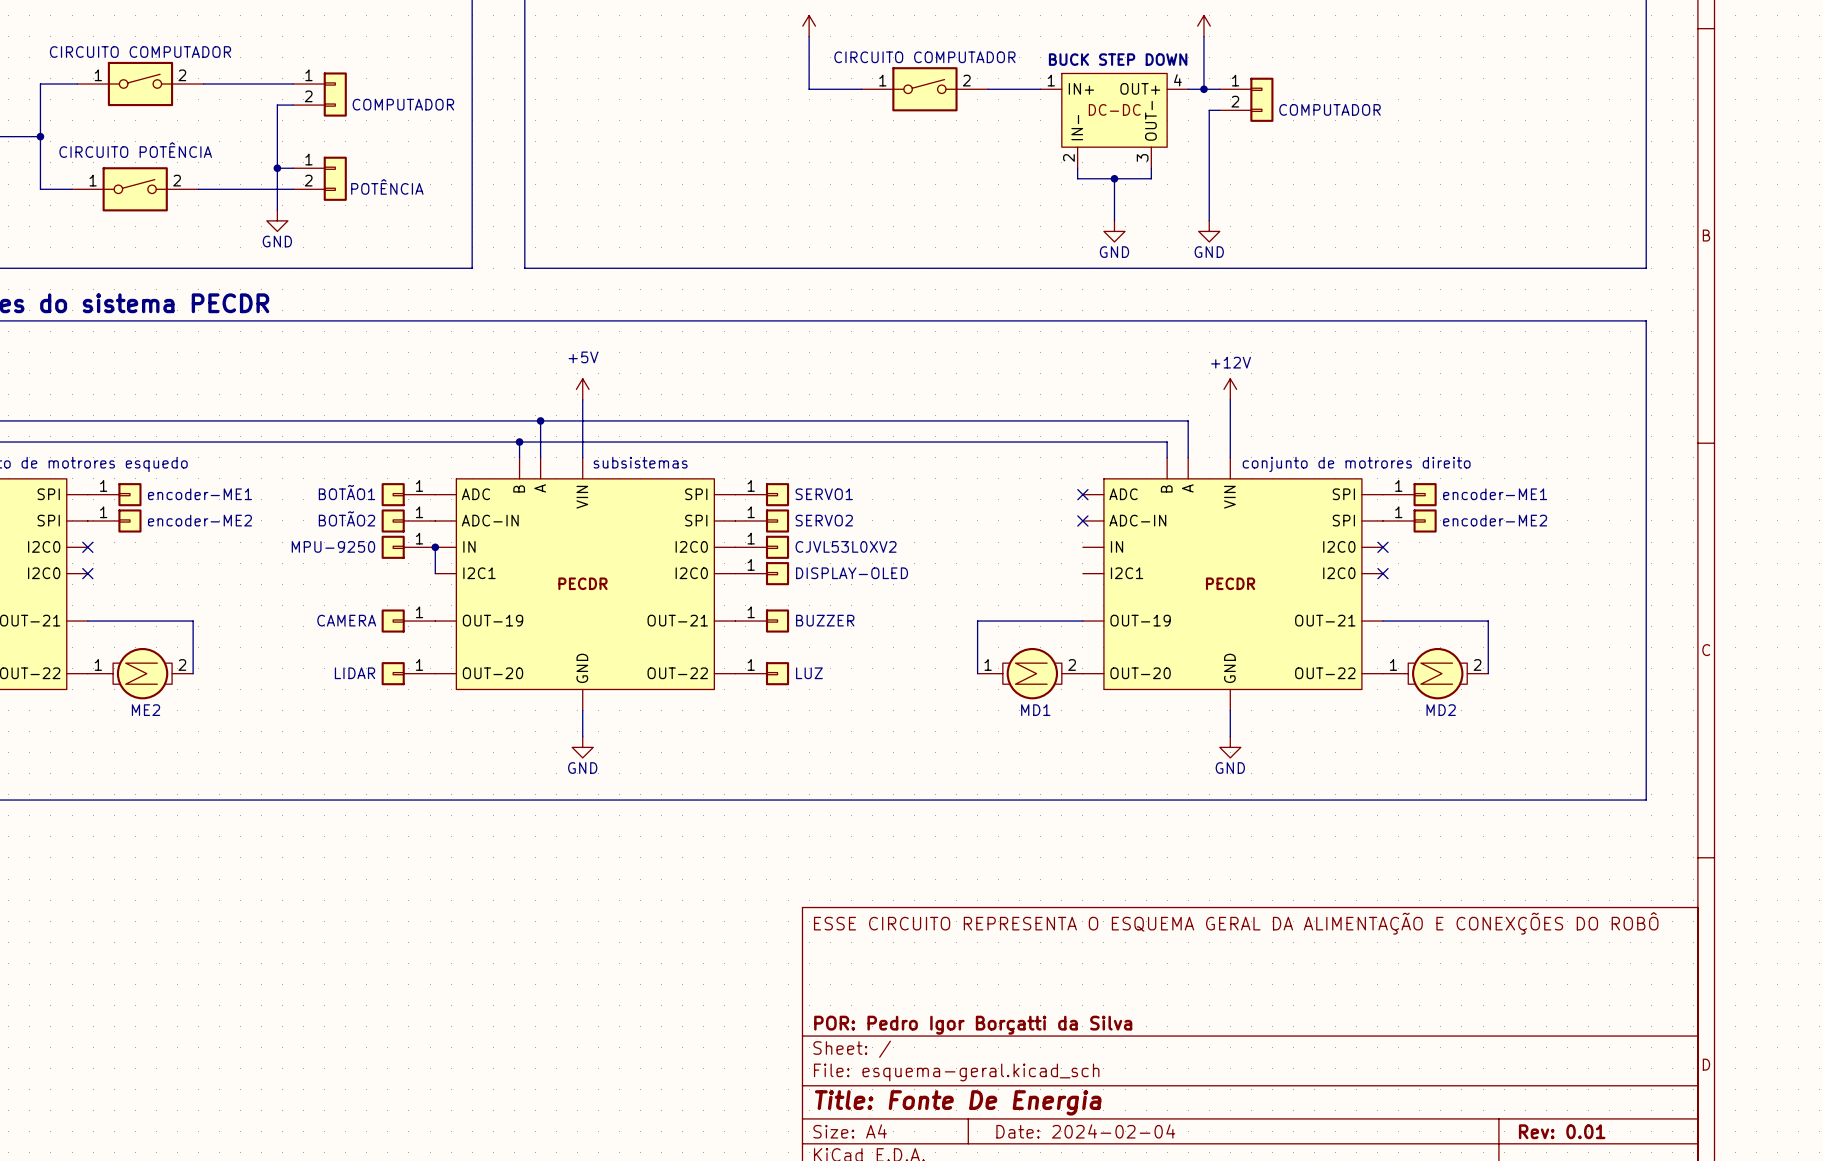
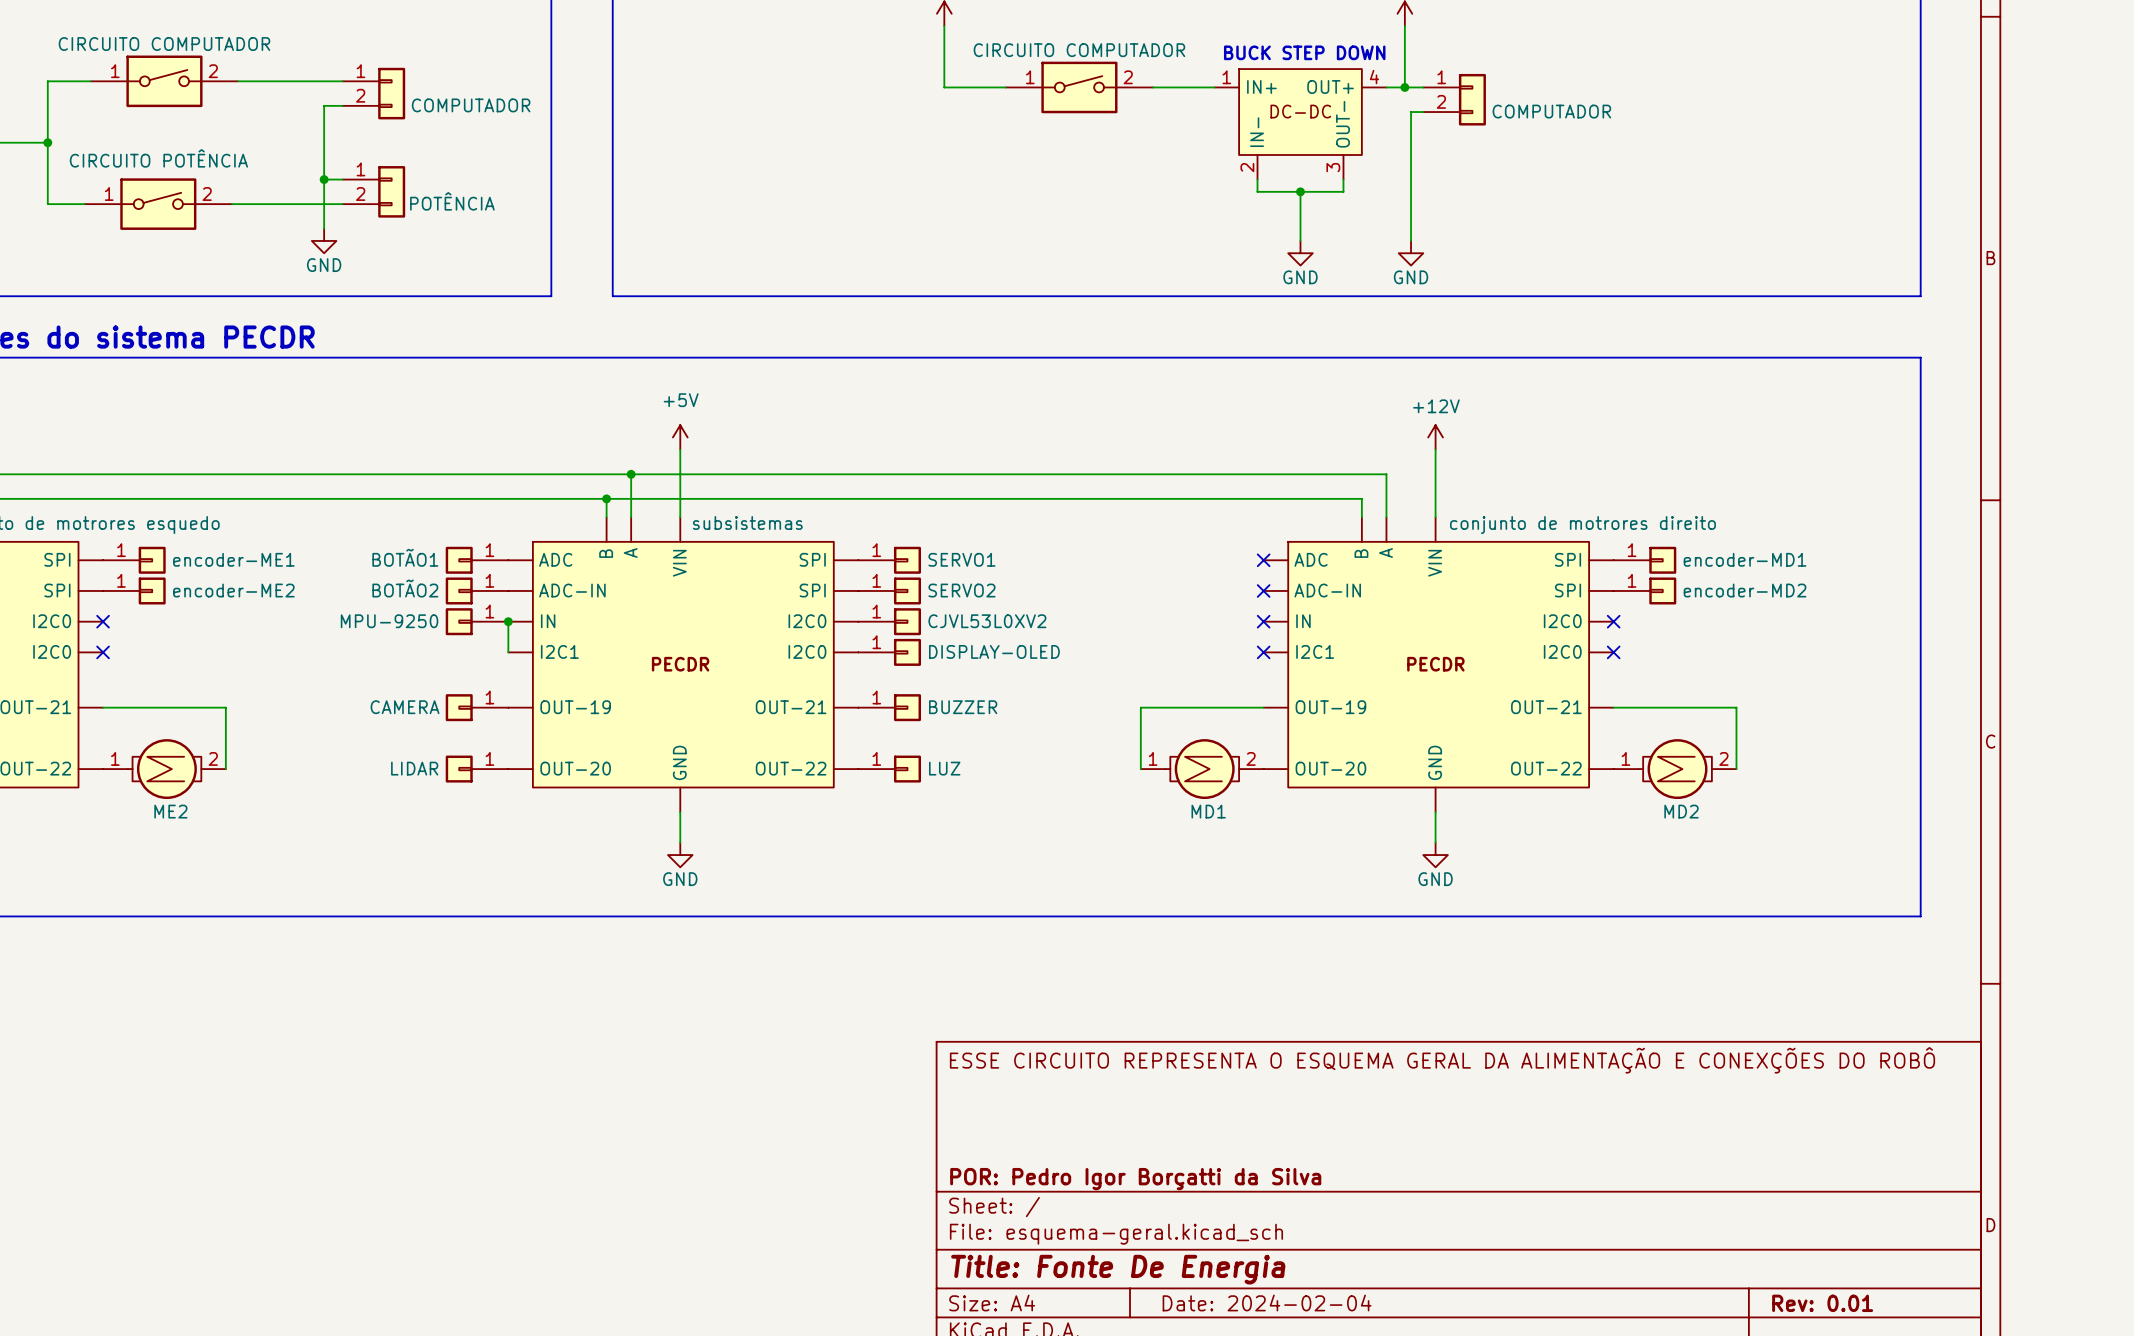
part value: encoder-ME1 (1495, 494) -> encoder-MD1 (1745, 559)
part value: encoder-ME2 (1495, 520) -> encoder-MD2 (1745, 590)
no-connect mark: none -> (1263, 621)
no-connect mark: none -> (1263, 652)

